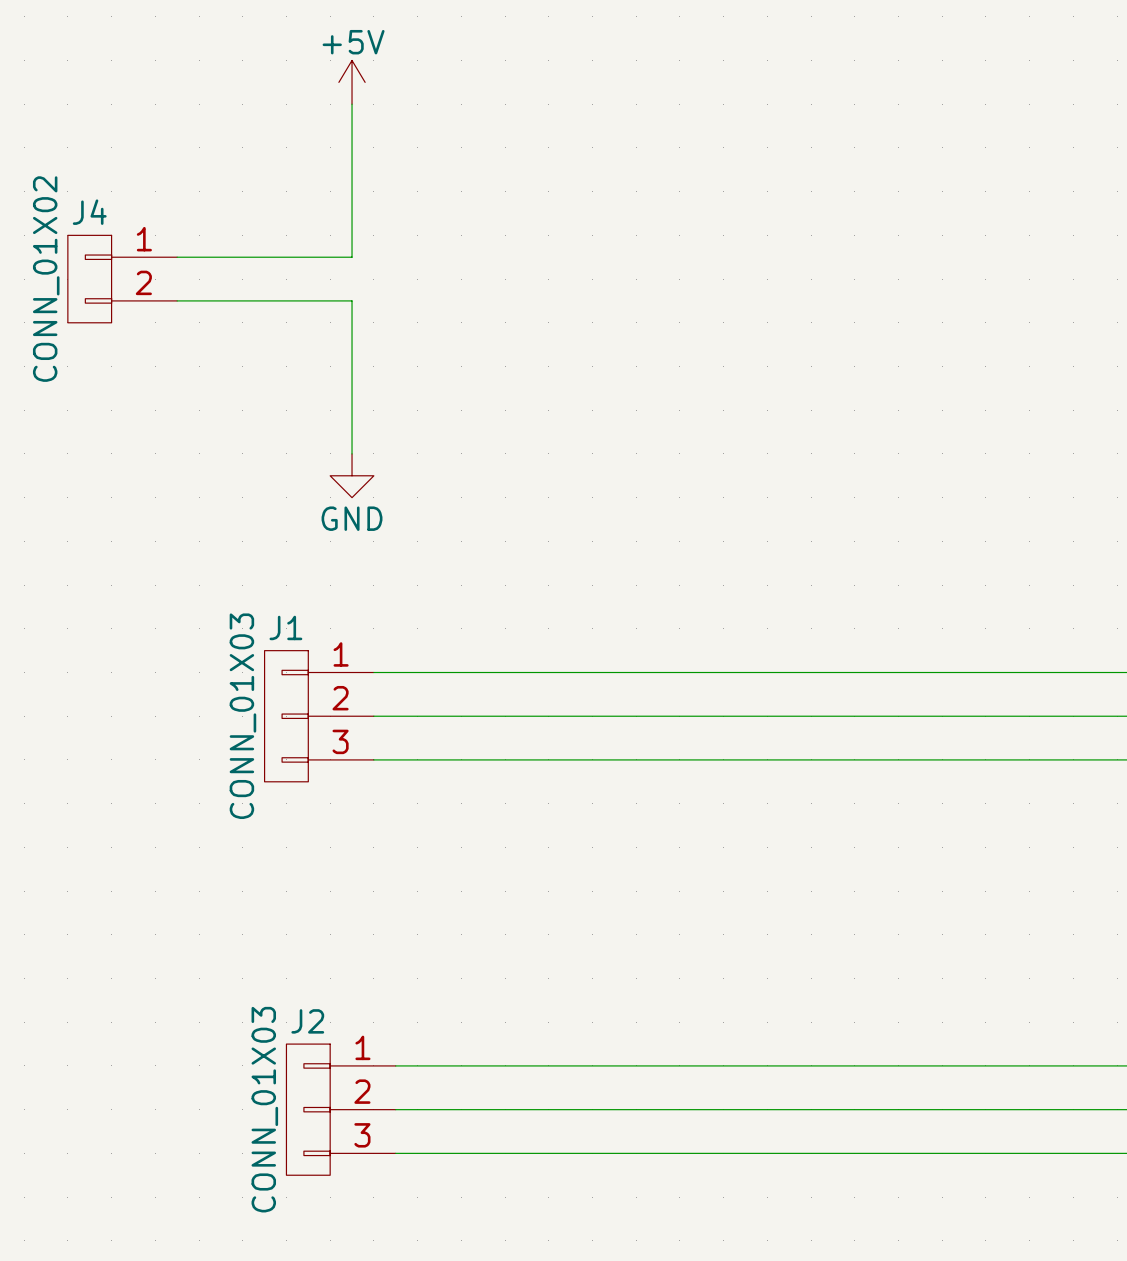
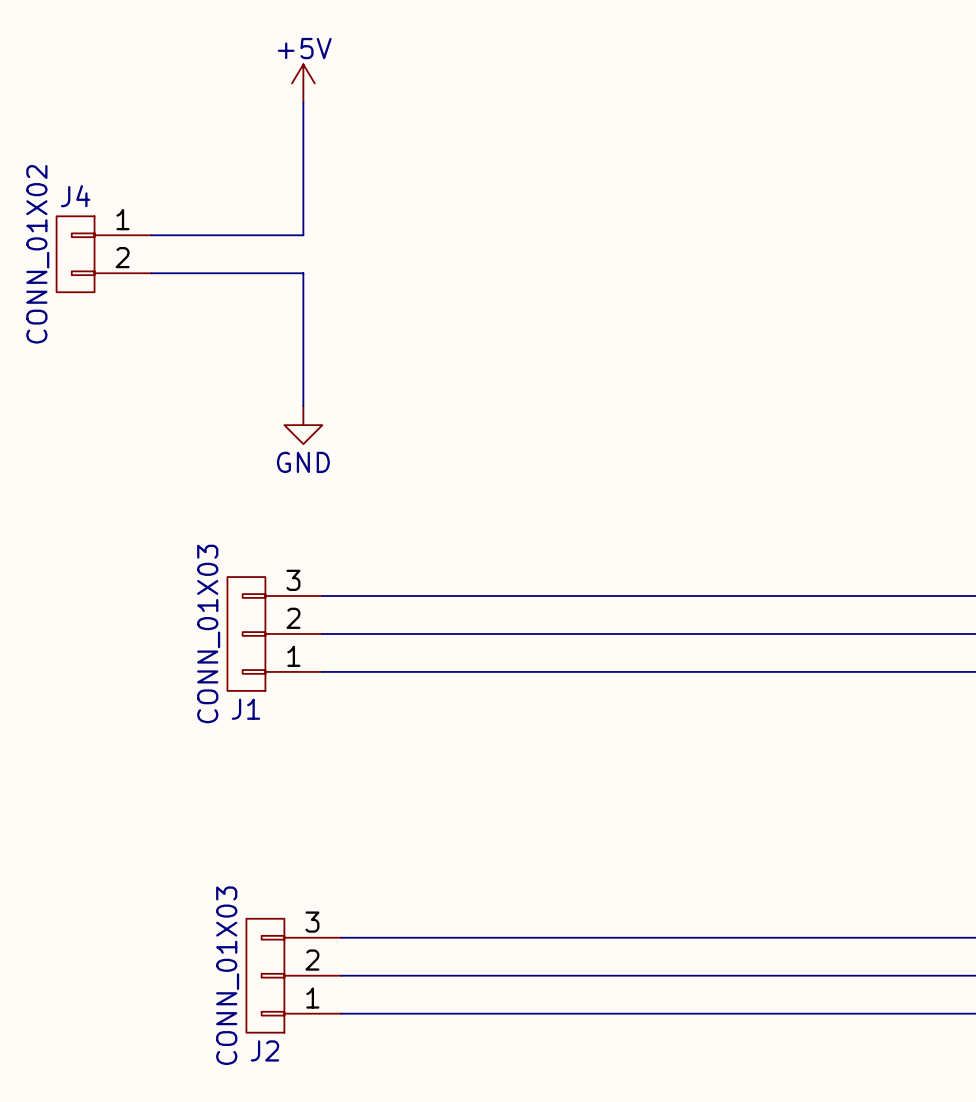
J1 flip: as is (286, 716) -> up-down (246, 633)
J2 flip: as is (308, 1109) -> up-down (265, 975)

